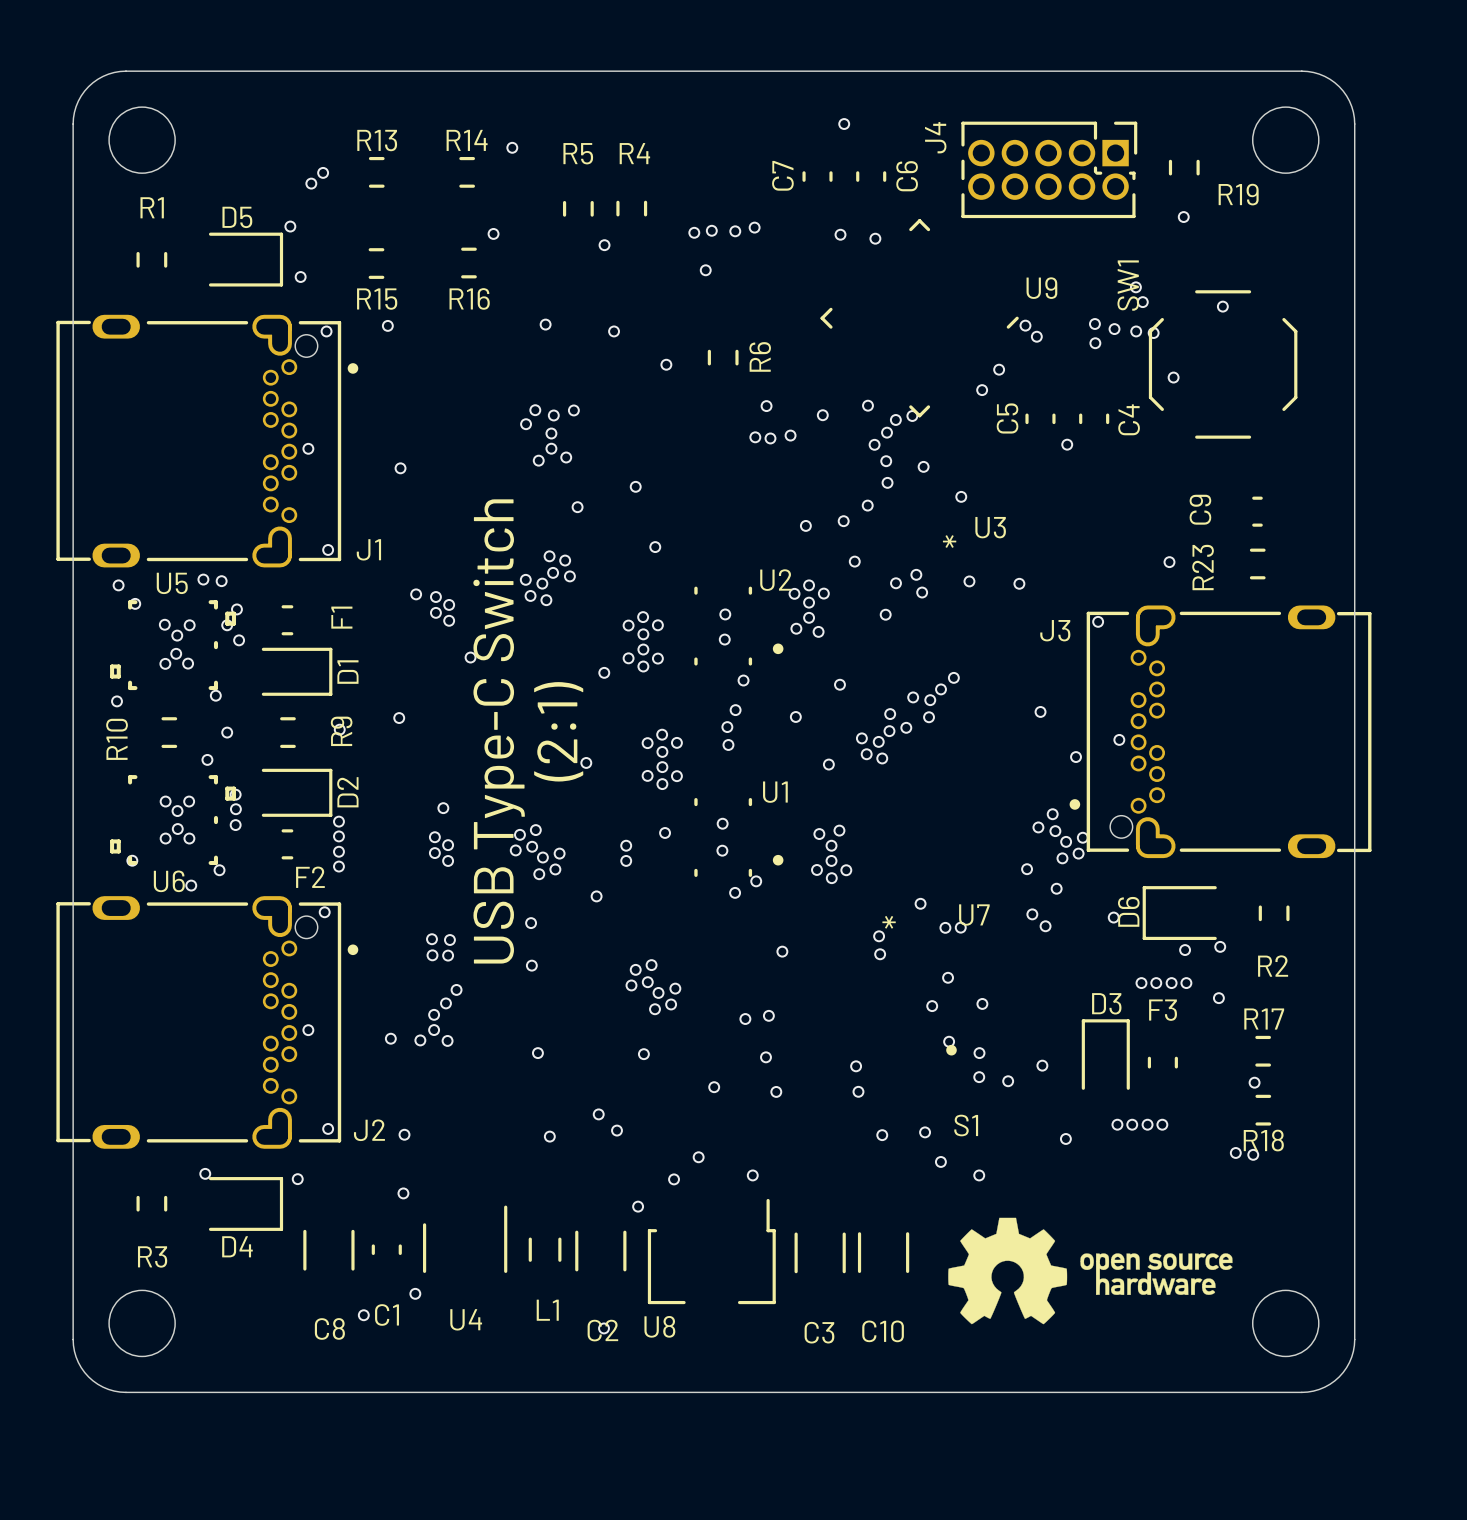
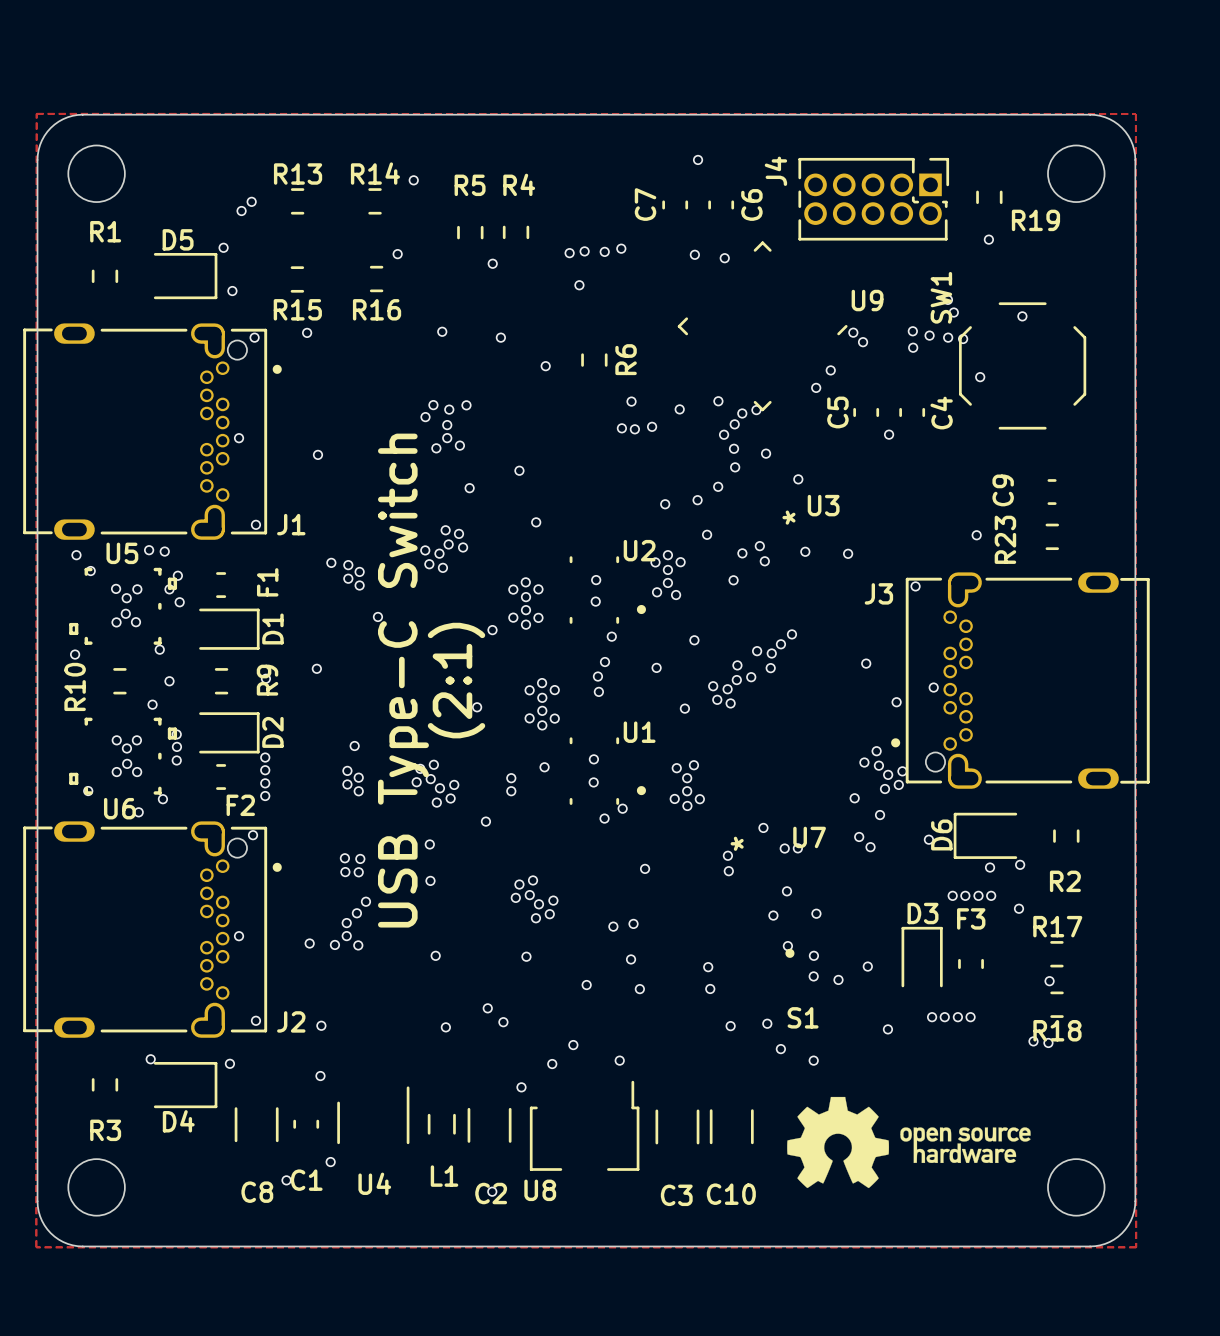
zone outline: none -> (36, 113) (36, 1247) (1136, 1247) (1135, 114) (36, 113)

